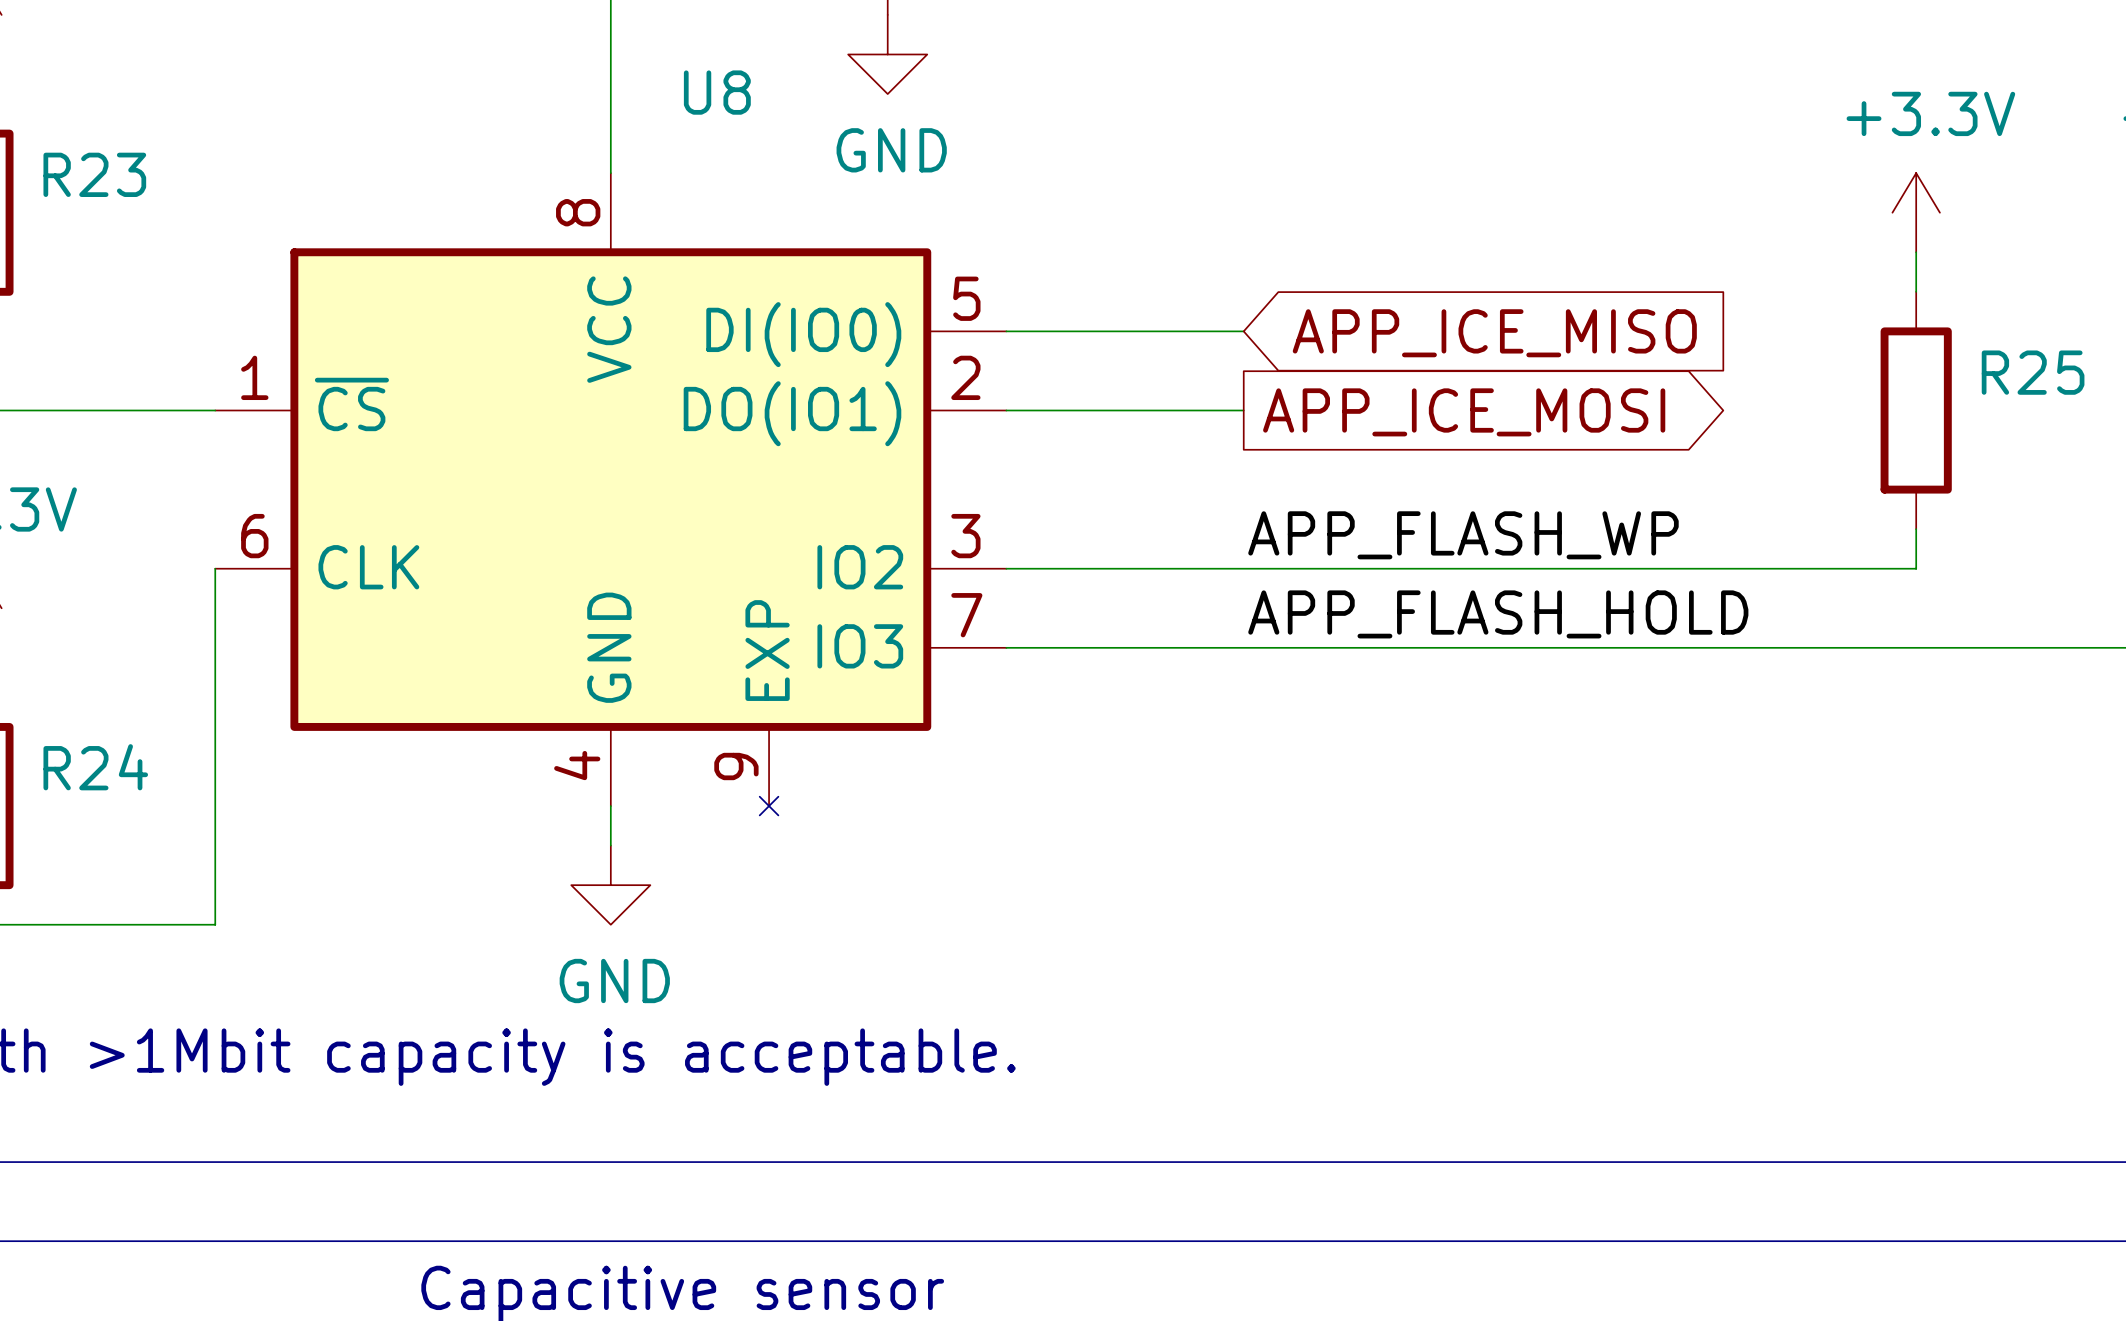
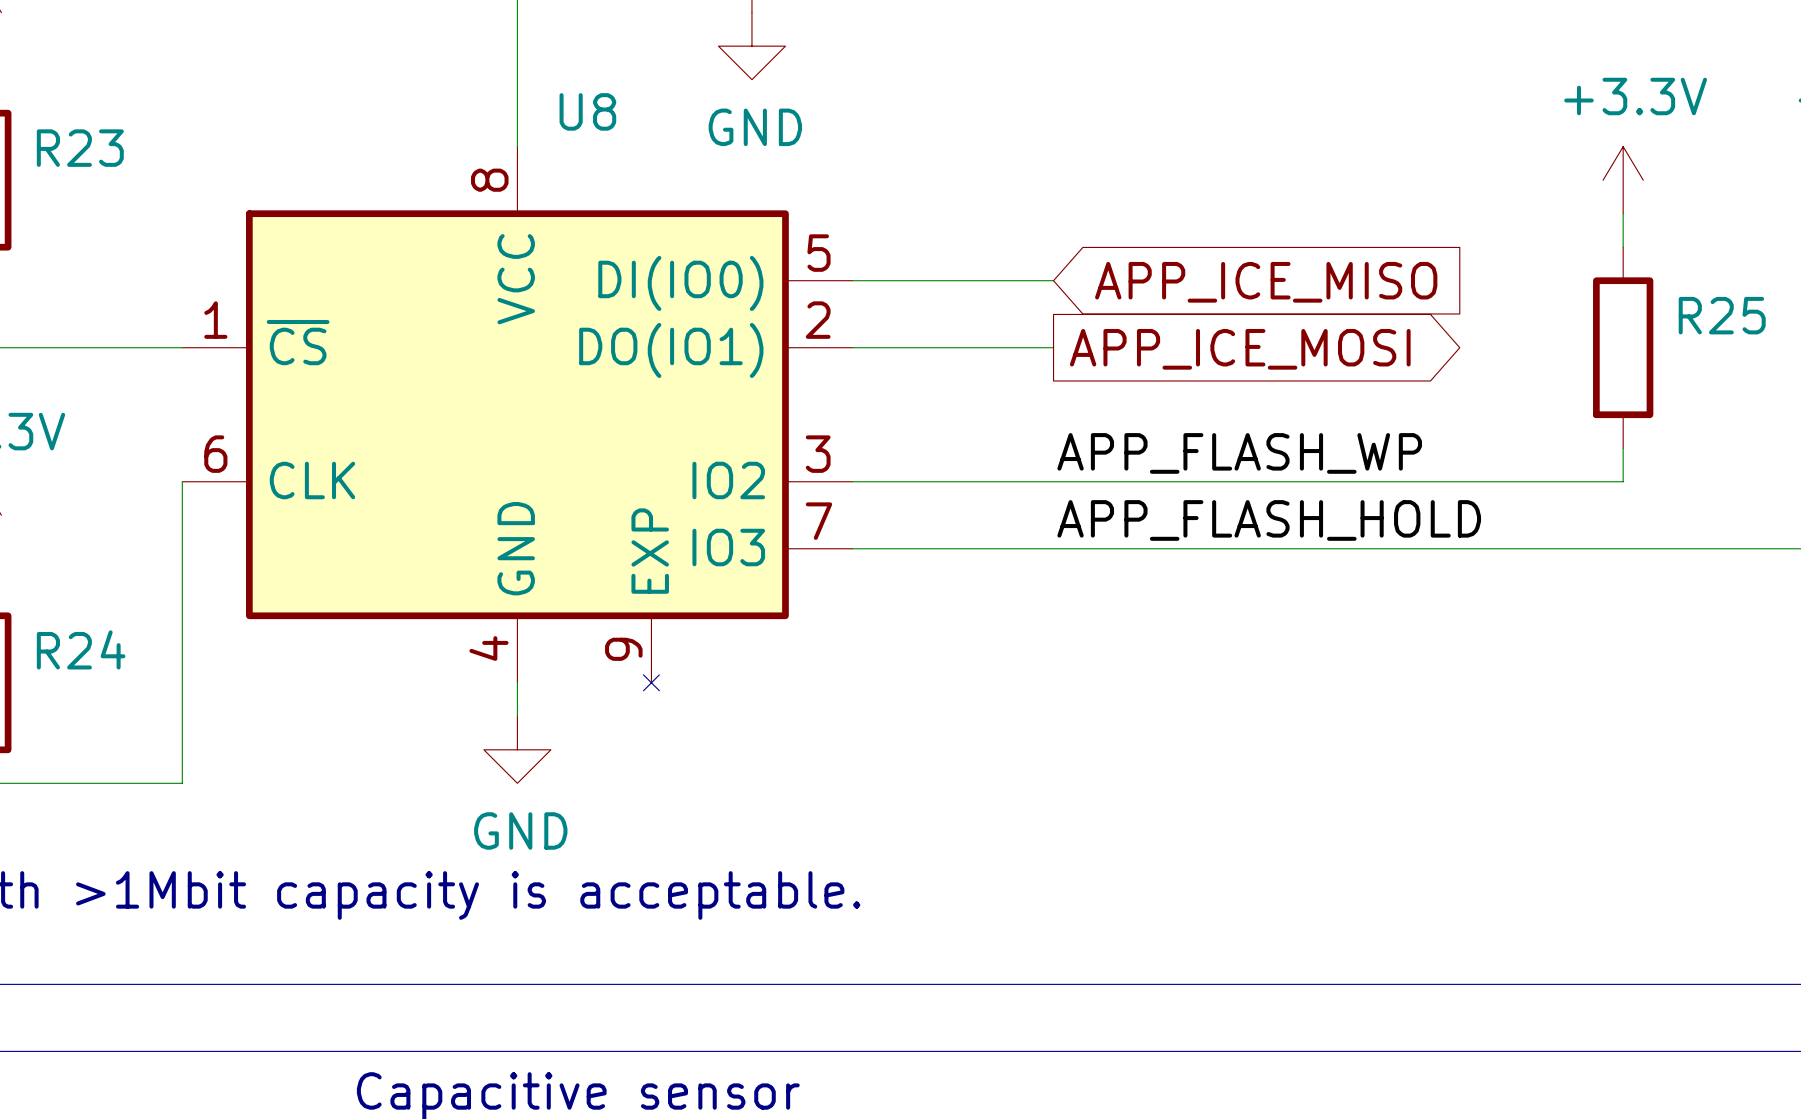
U8 name position: U8 (717, 92) -> U8 (587, 111)

